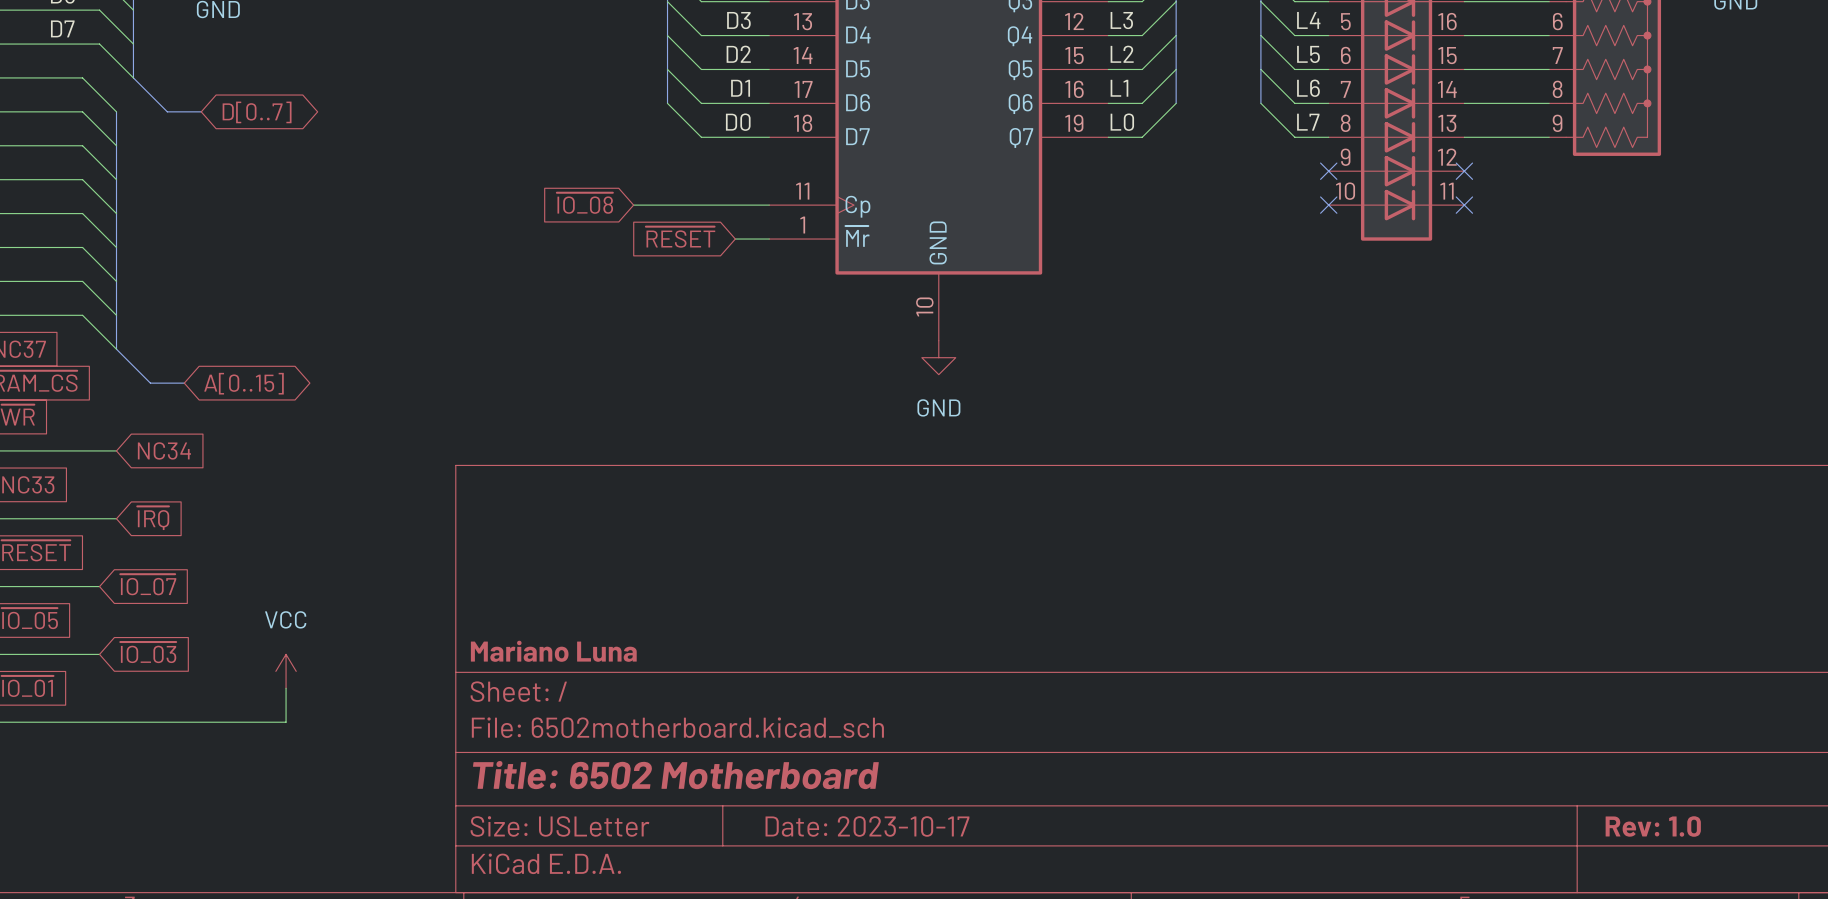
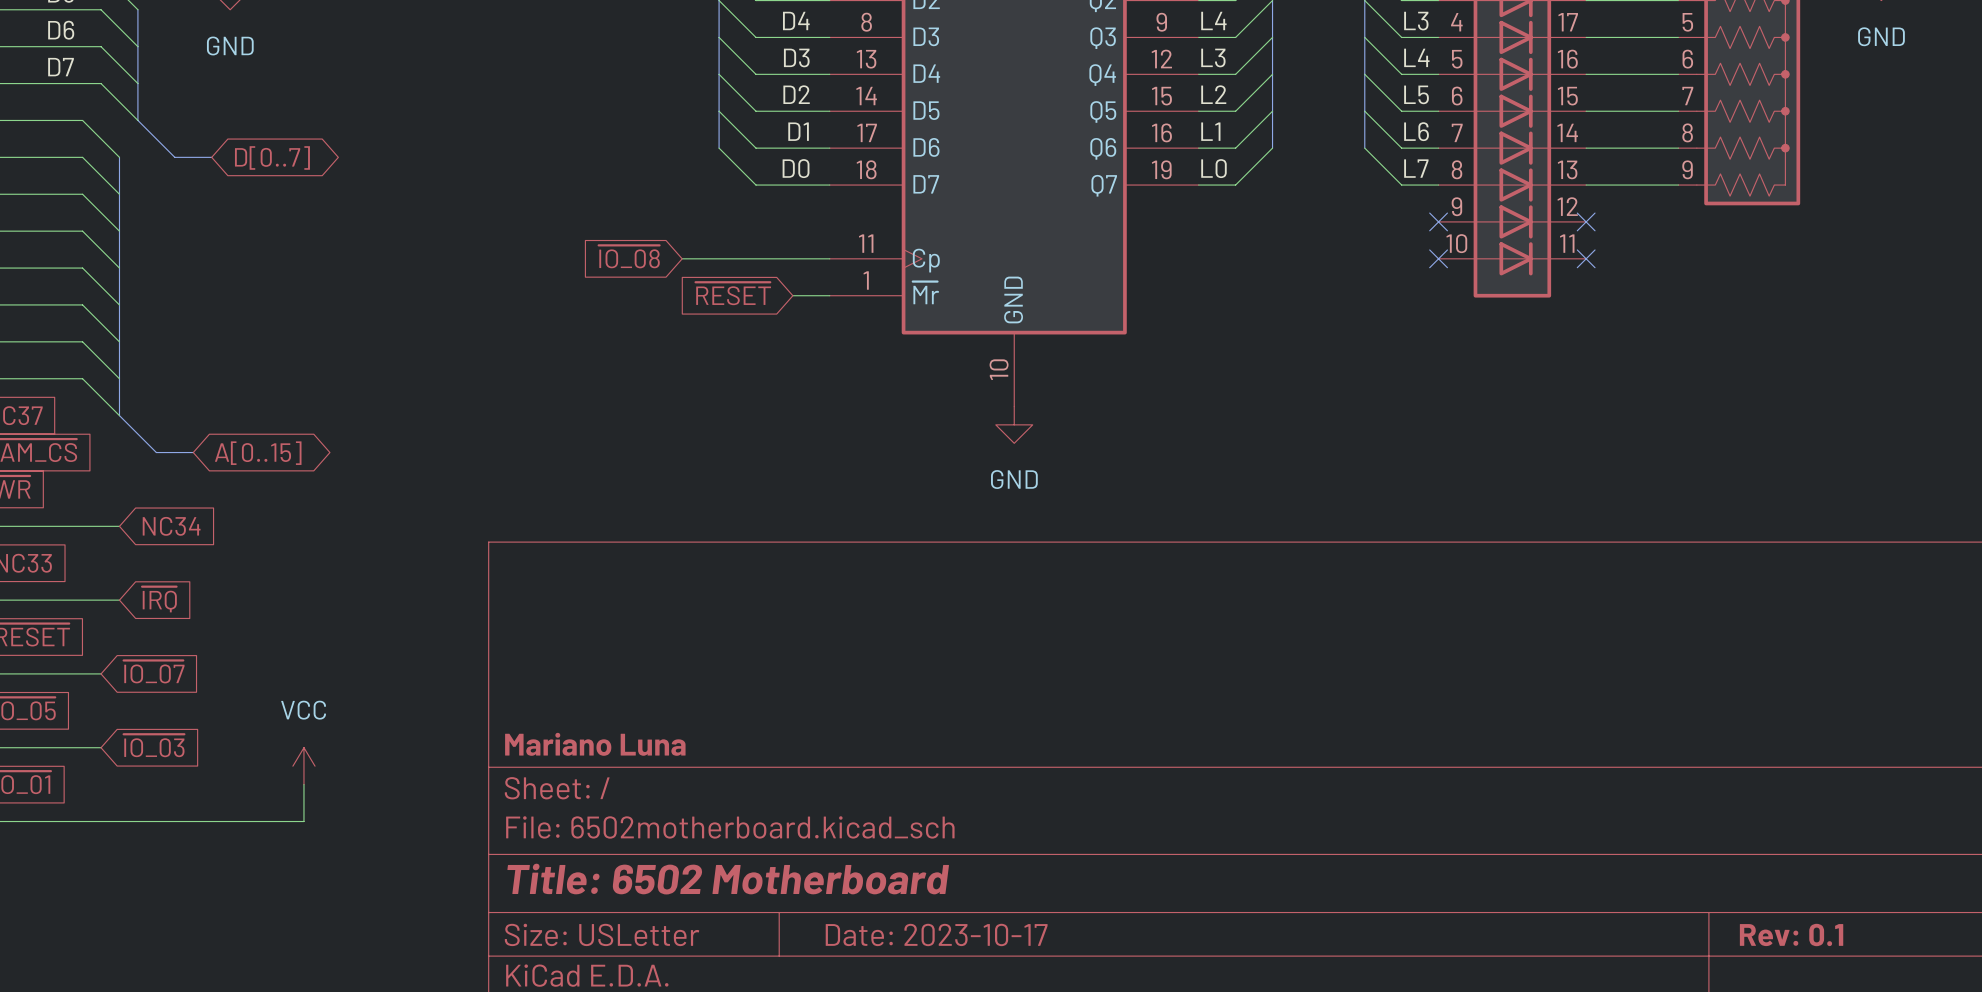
title block: Rev: 1.0 (1653, 826) -> Rev: 0.1 (1791, 935)

